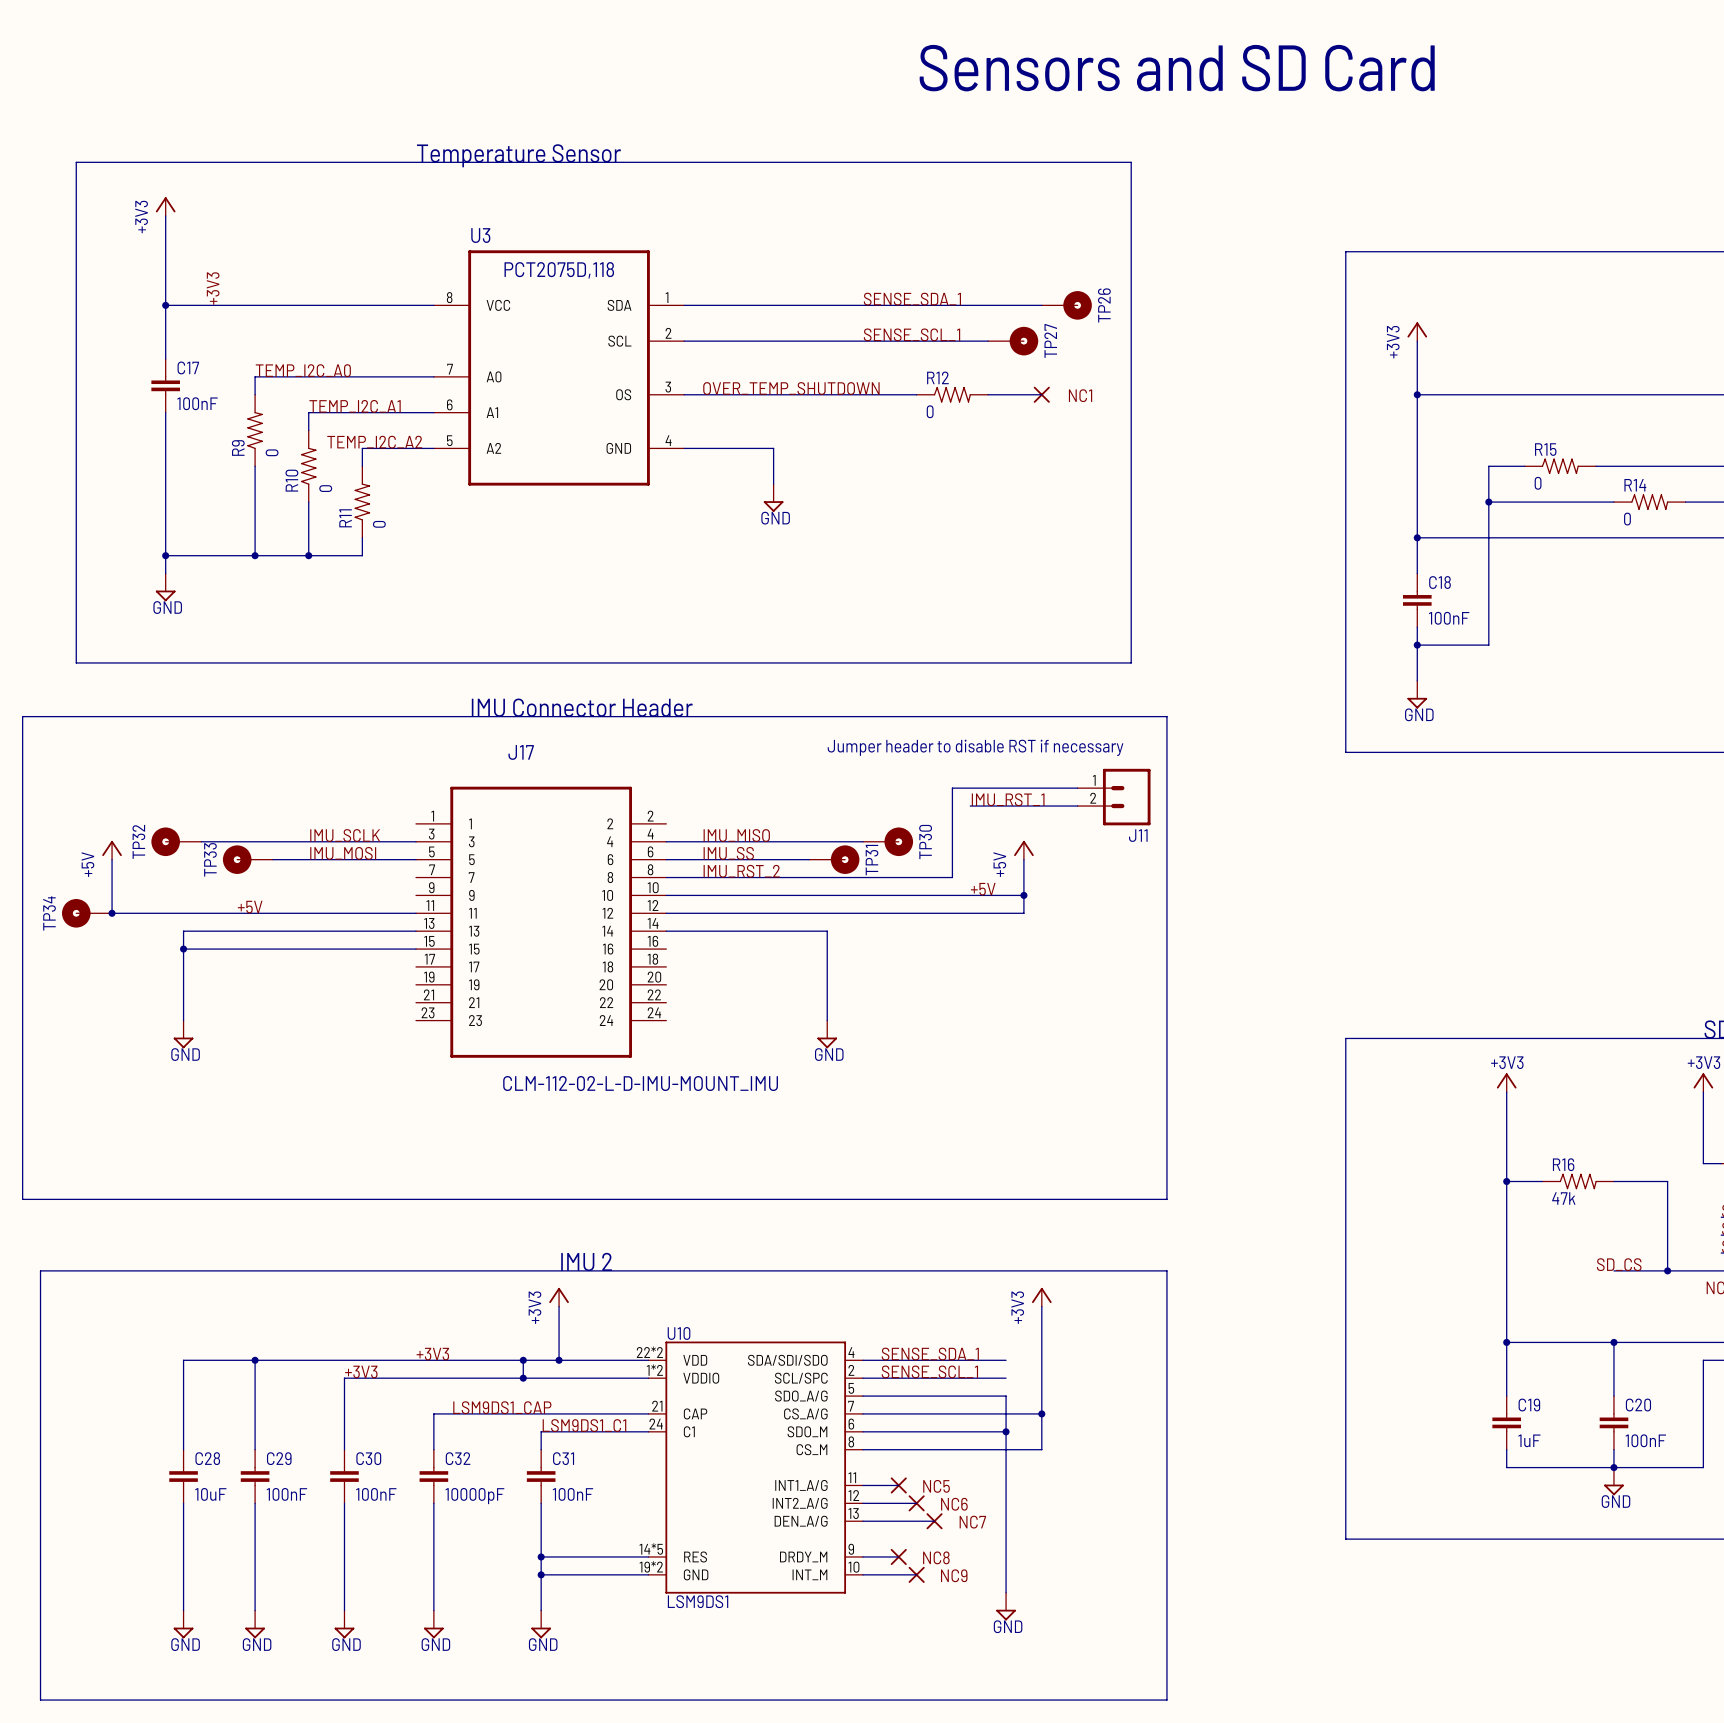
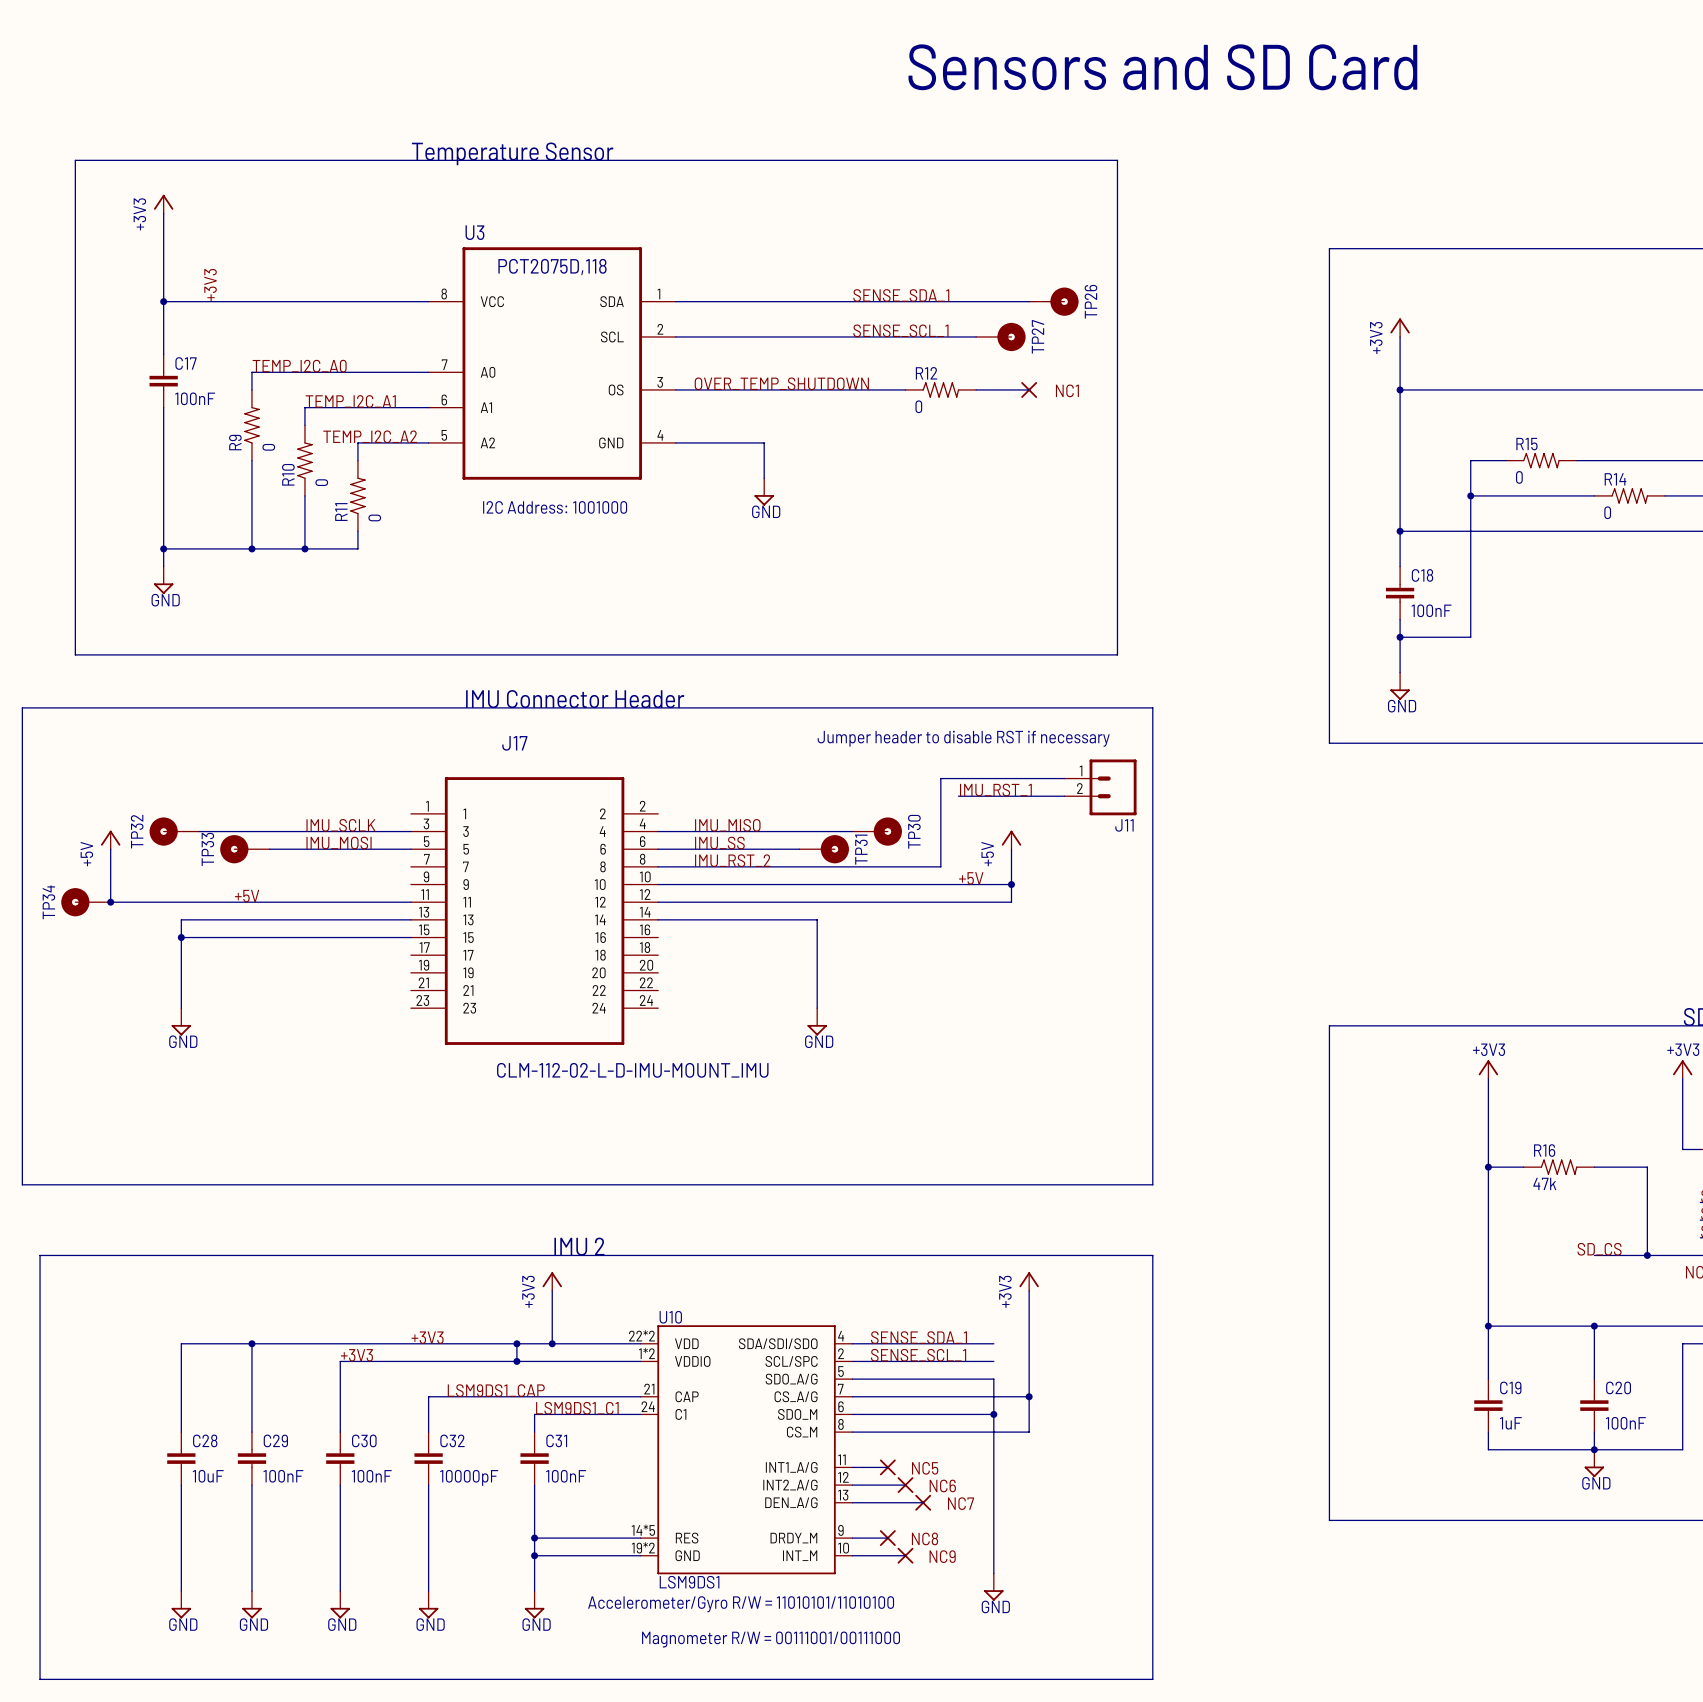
text: none -> I2C Address: 1001000 (555, 507)
text: none -> Accelerometer/Gyro R/W = 11010101/11010100 (741, 1604)
text: none -> Magnometer R/W = 00111001/00111000 (771, 1639)

